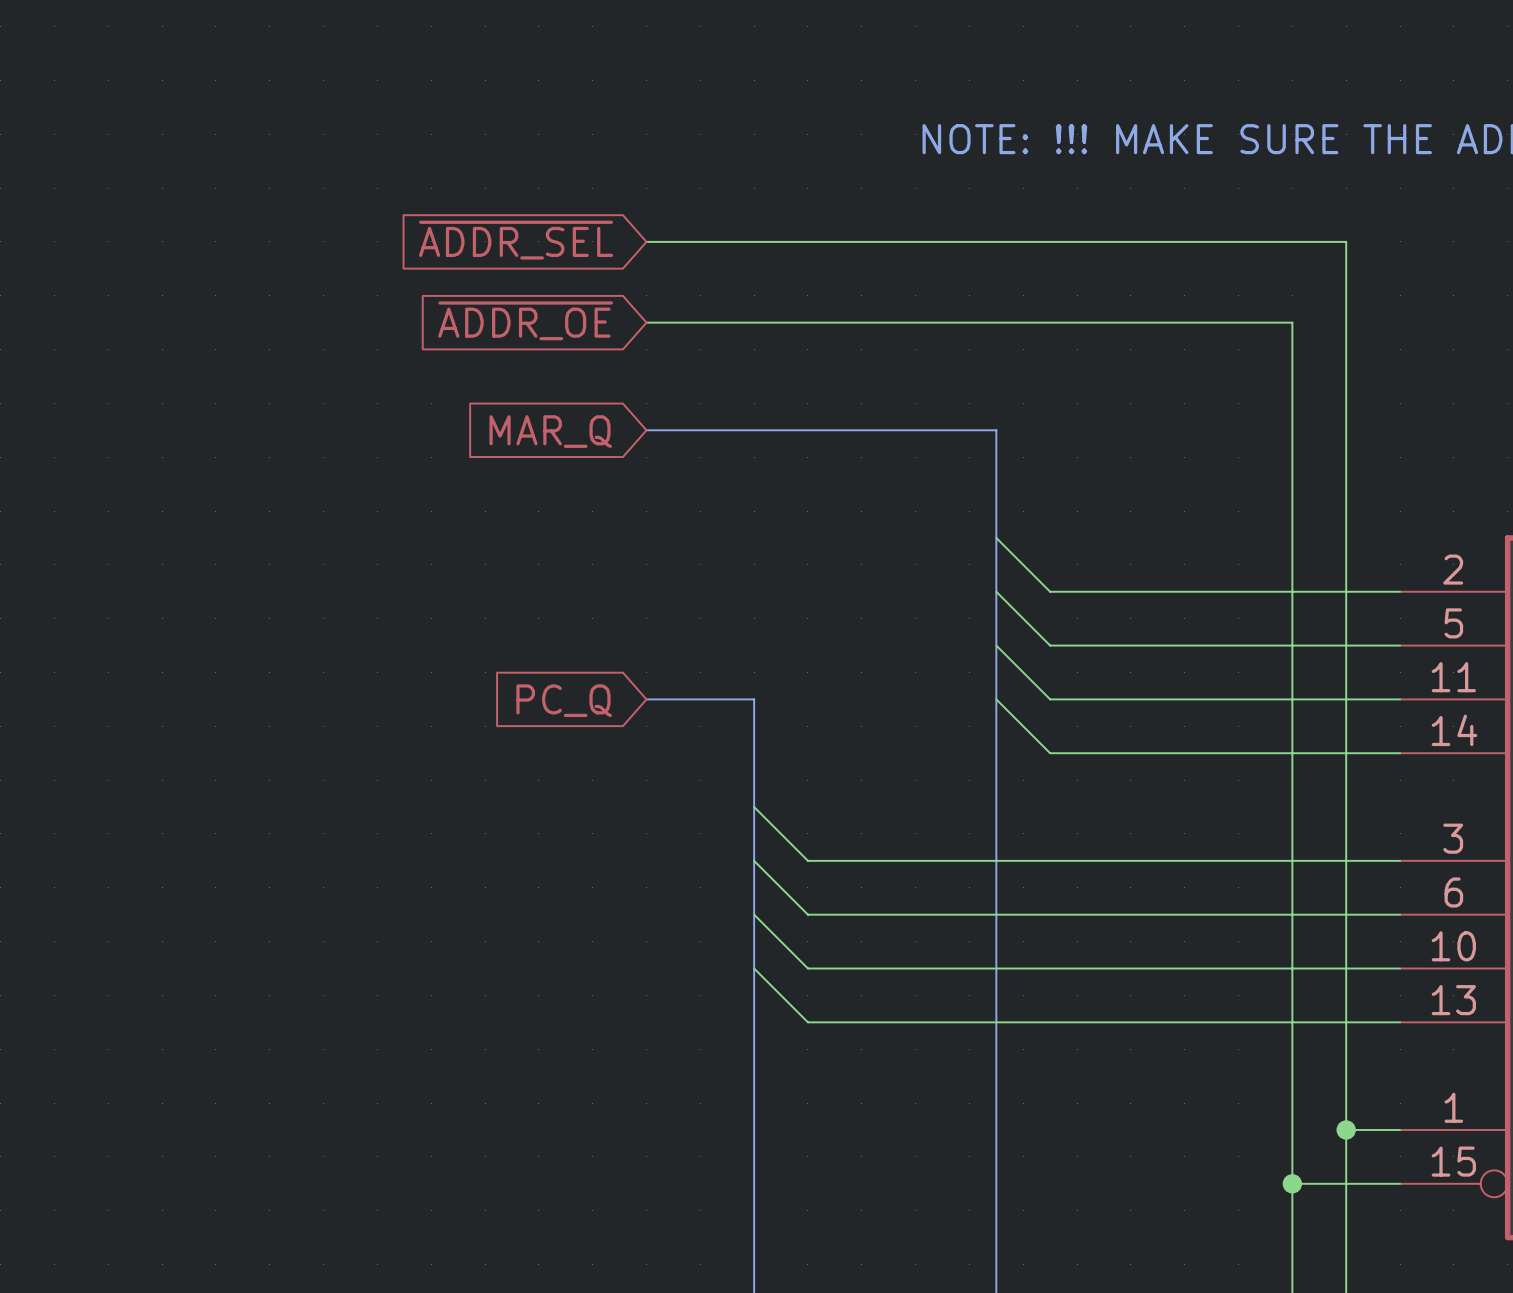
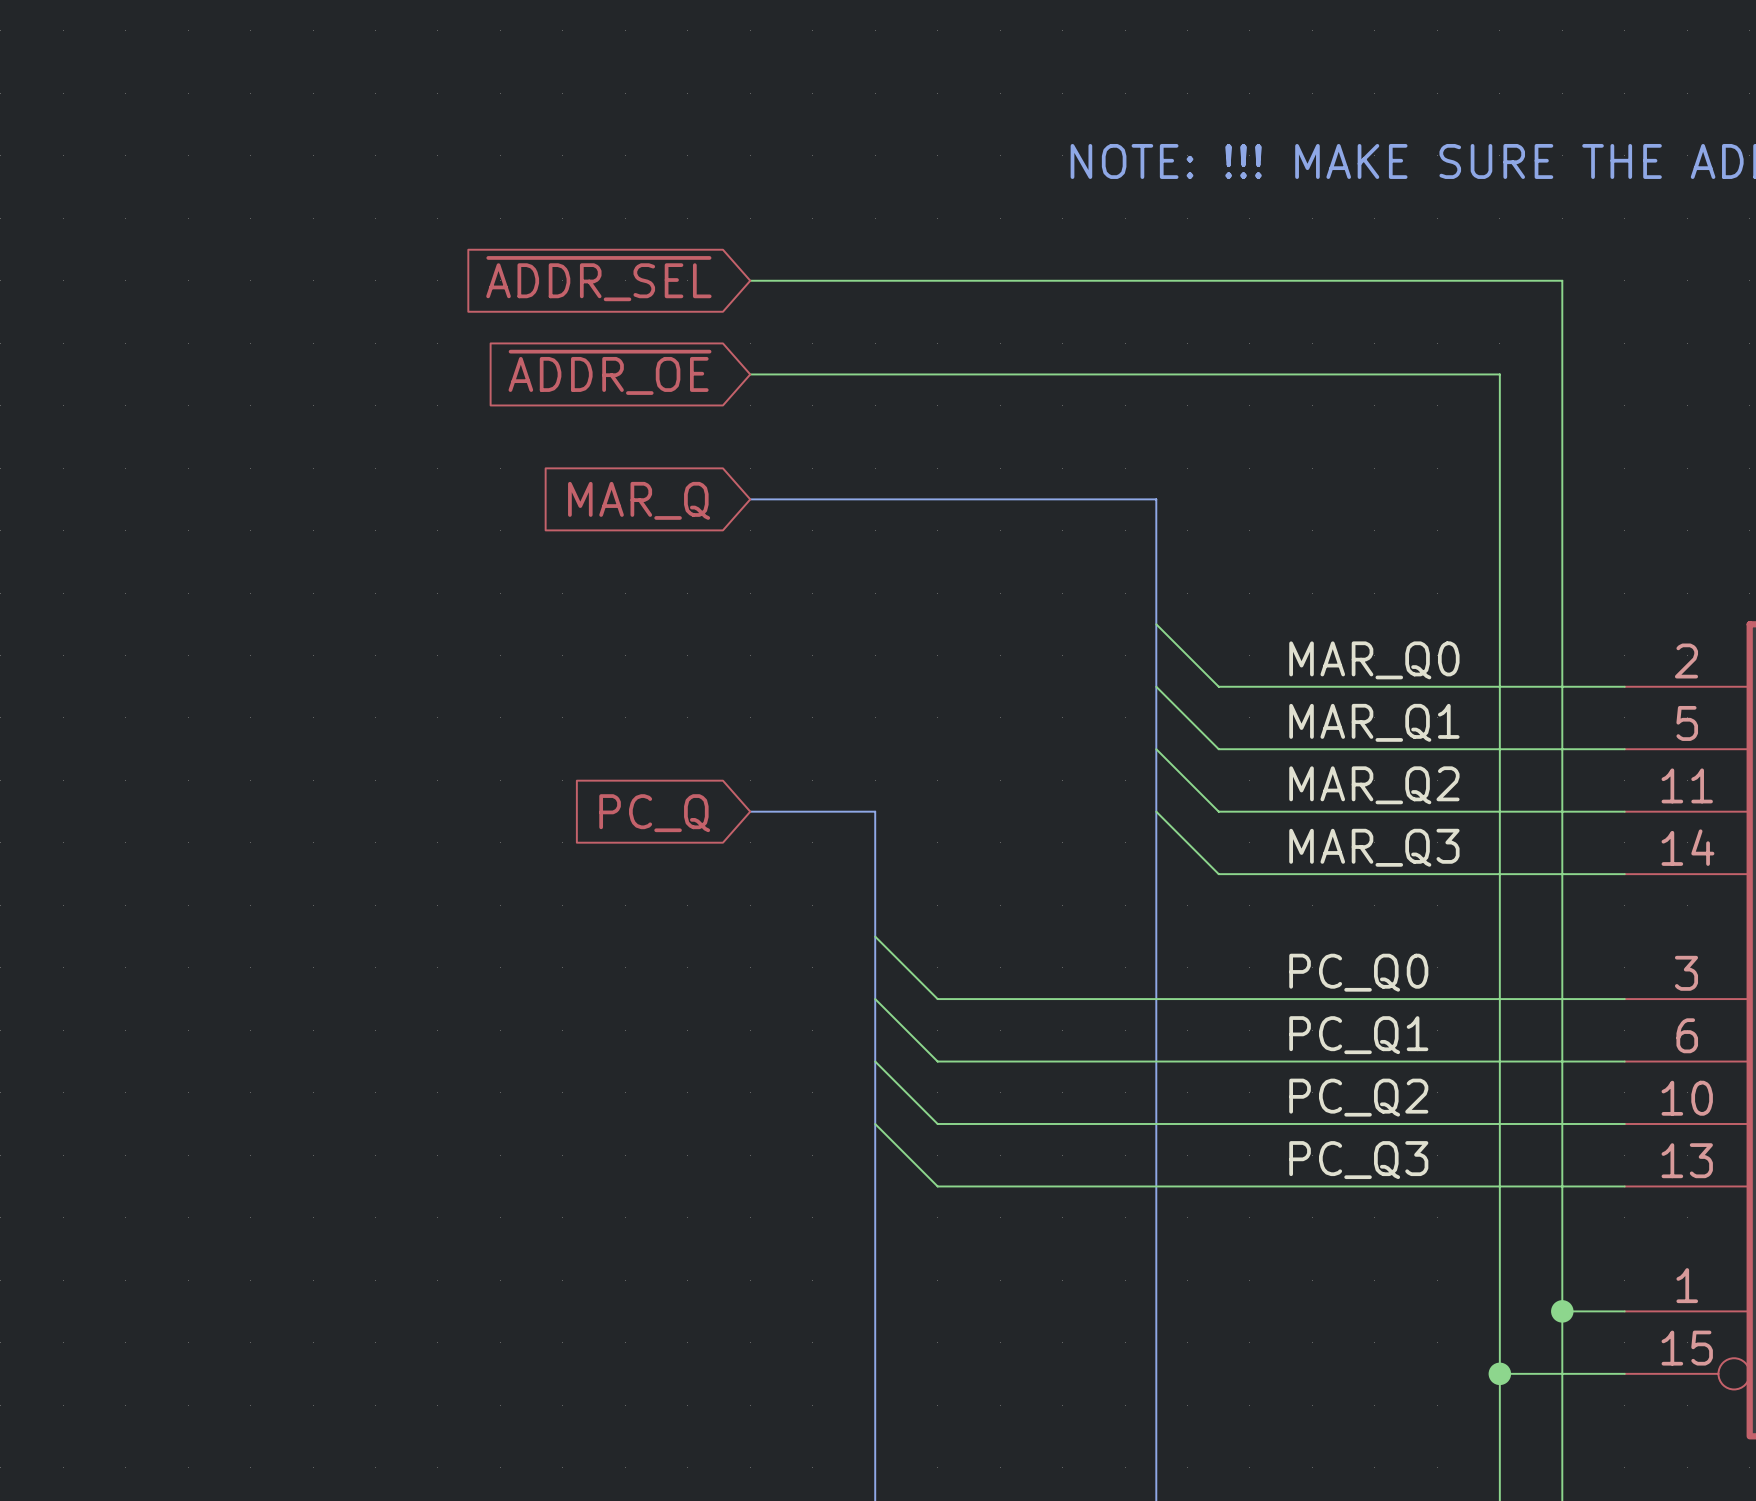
label: none -> MAR_Q0 (1374, 660)
label: none -> MAR_Q1 (1374, 722)
label: none -> MAR_Q2 (1374, 785)
label: none -> MAR_Q3 (1374, 847)
label: none -> PC_Q0 (1358, 972)
label: none -> PC_Q1 (1358, 1035)
label: none -> PC_Q2 (1358, 1097)
label: none -> PC_Q3 (1358, 1160)

